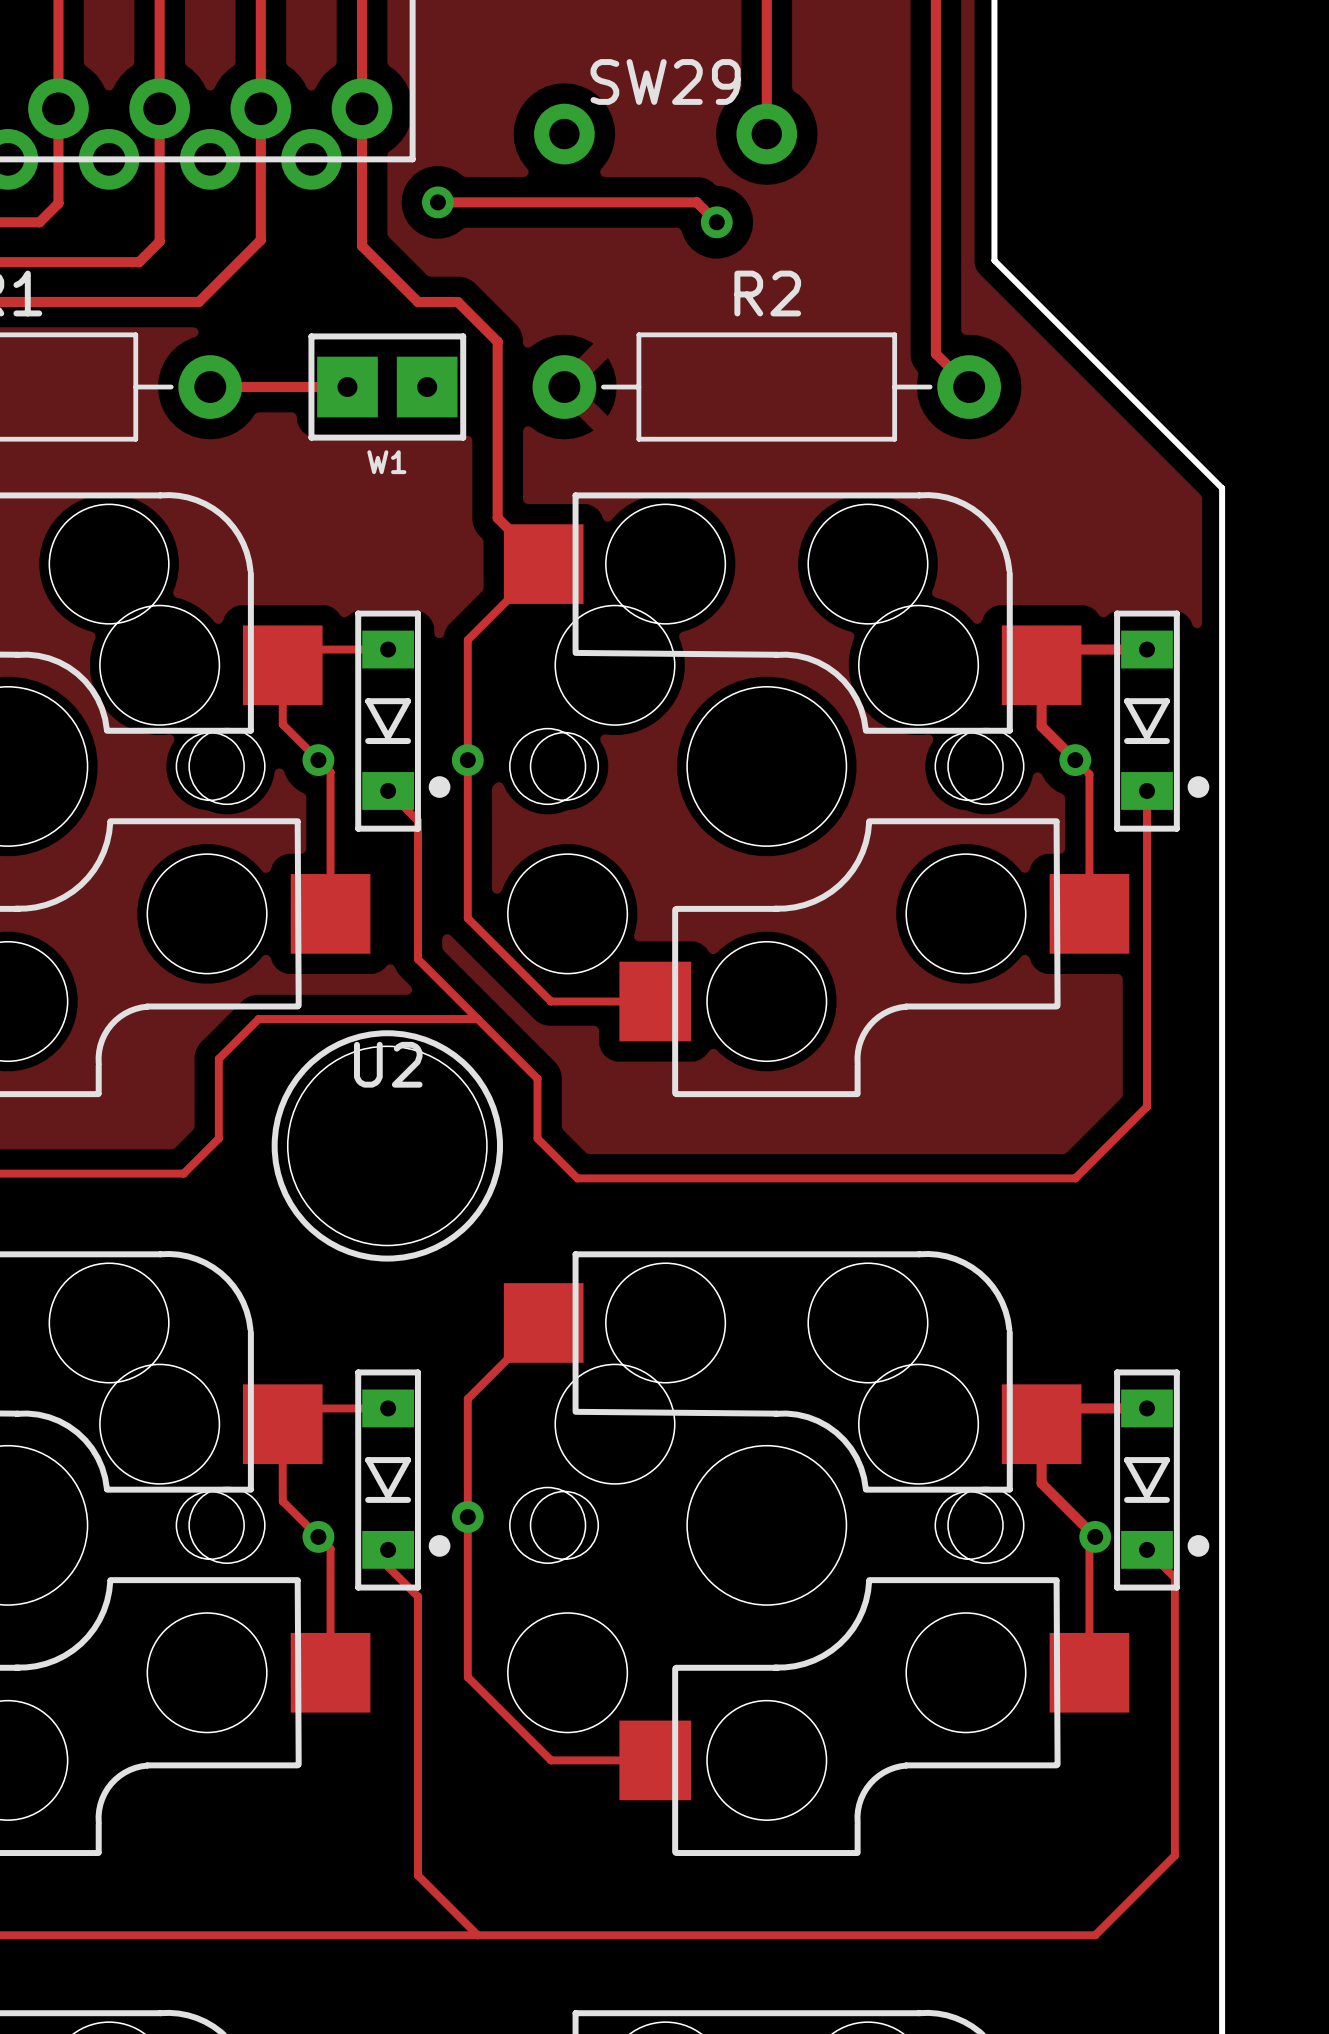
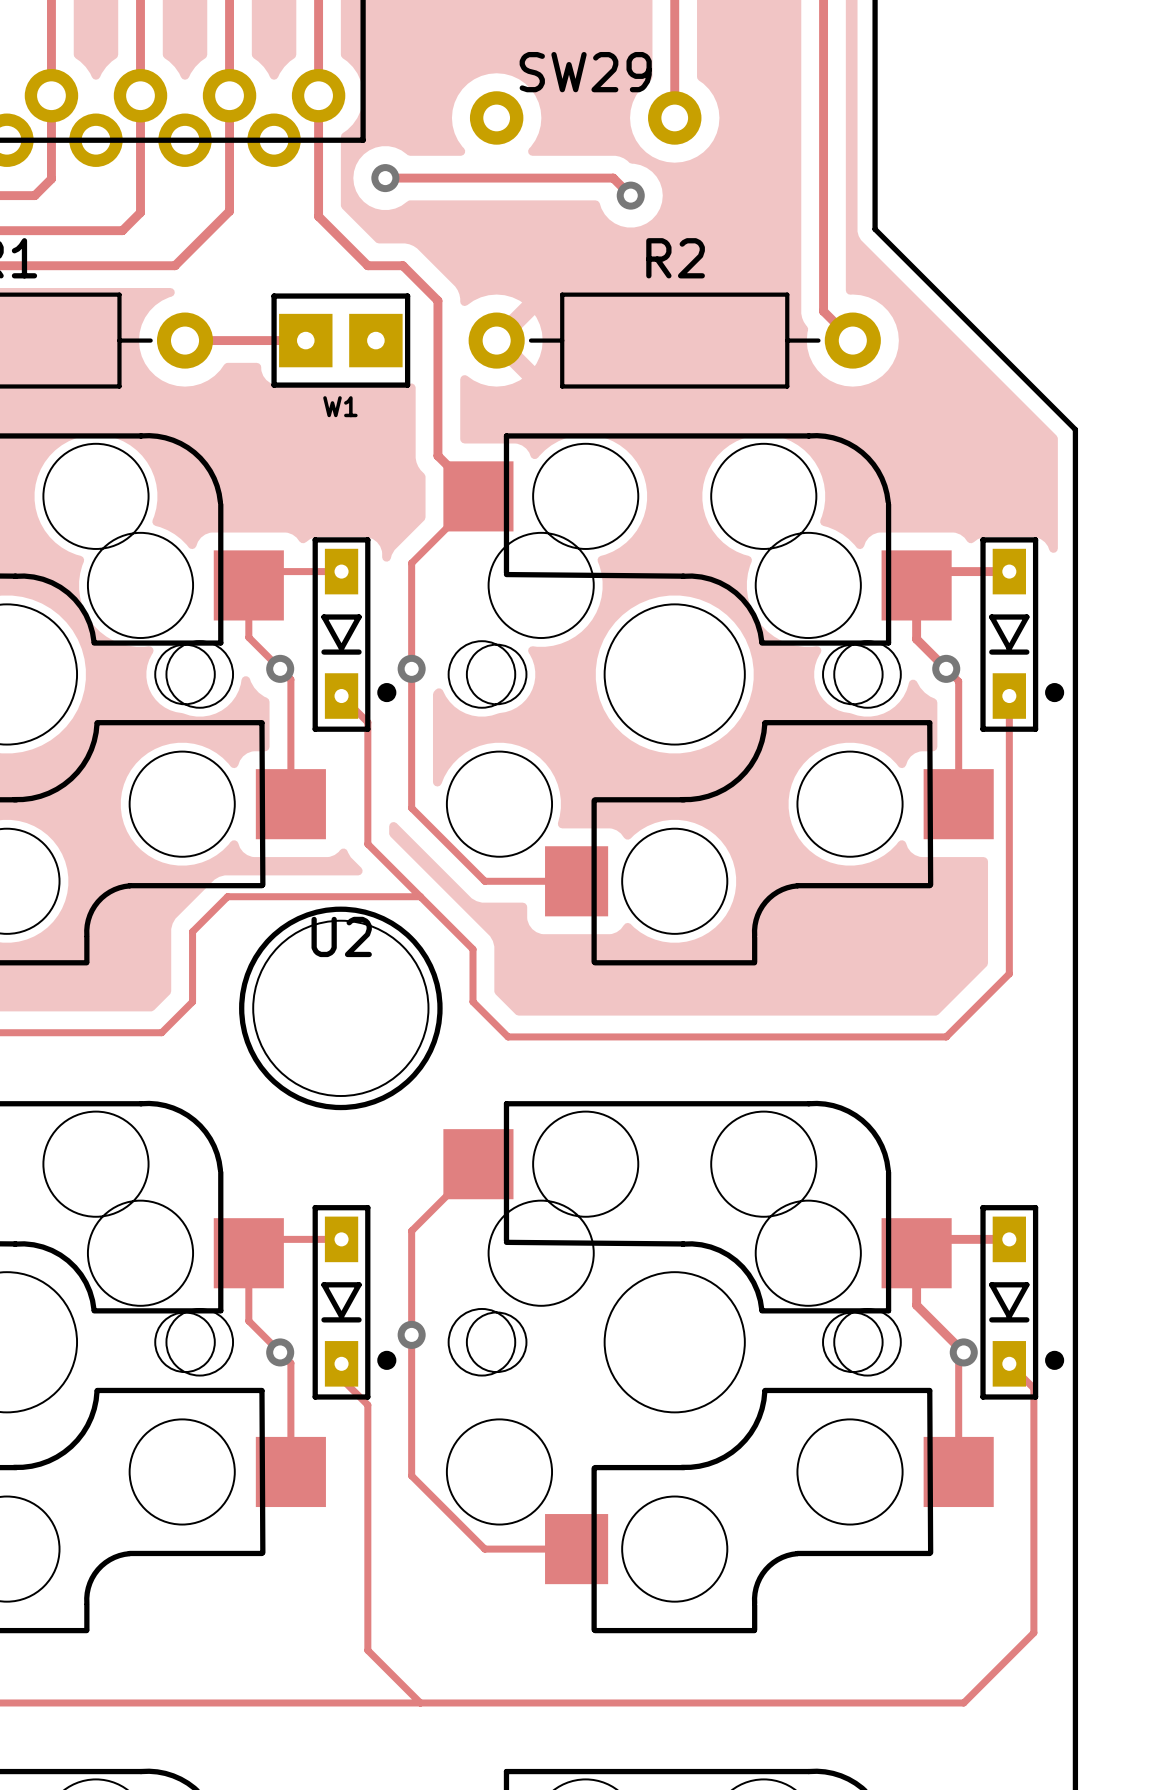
part footprint: [355, 610, 451, 832] -> [312, 537, 397, 732]
part footprint: [1114, 610, 1210, 832] -> [980, 537, 1065, 732]
part footprint: [355, 1369, 451, 1591] -> [312, 1205, 397, 1400]
part footprint: [1114, 1369, 1210, 1591] -> [980, 1205, 1065, 1400]

